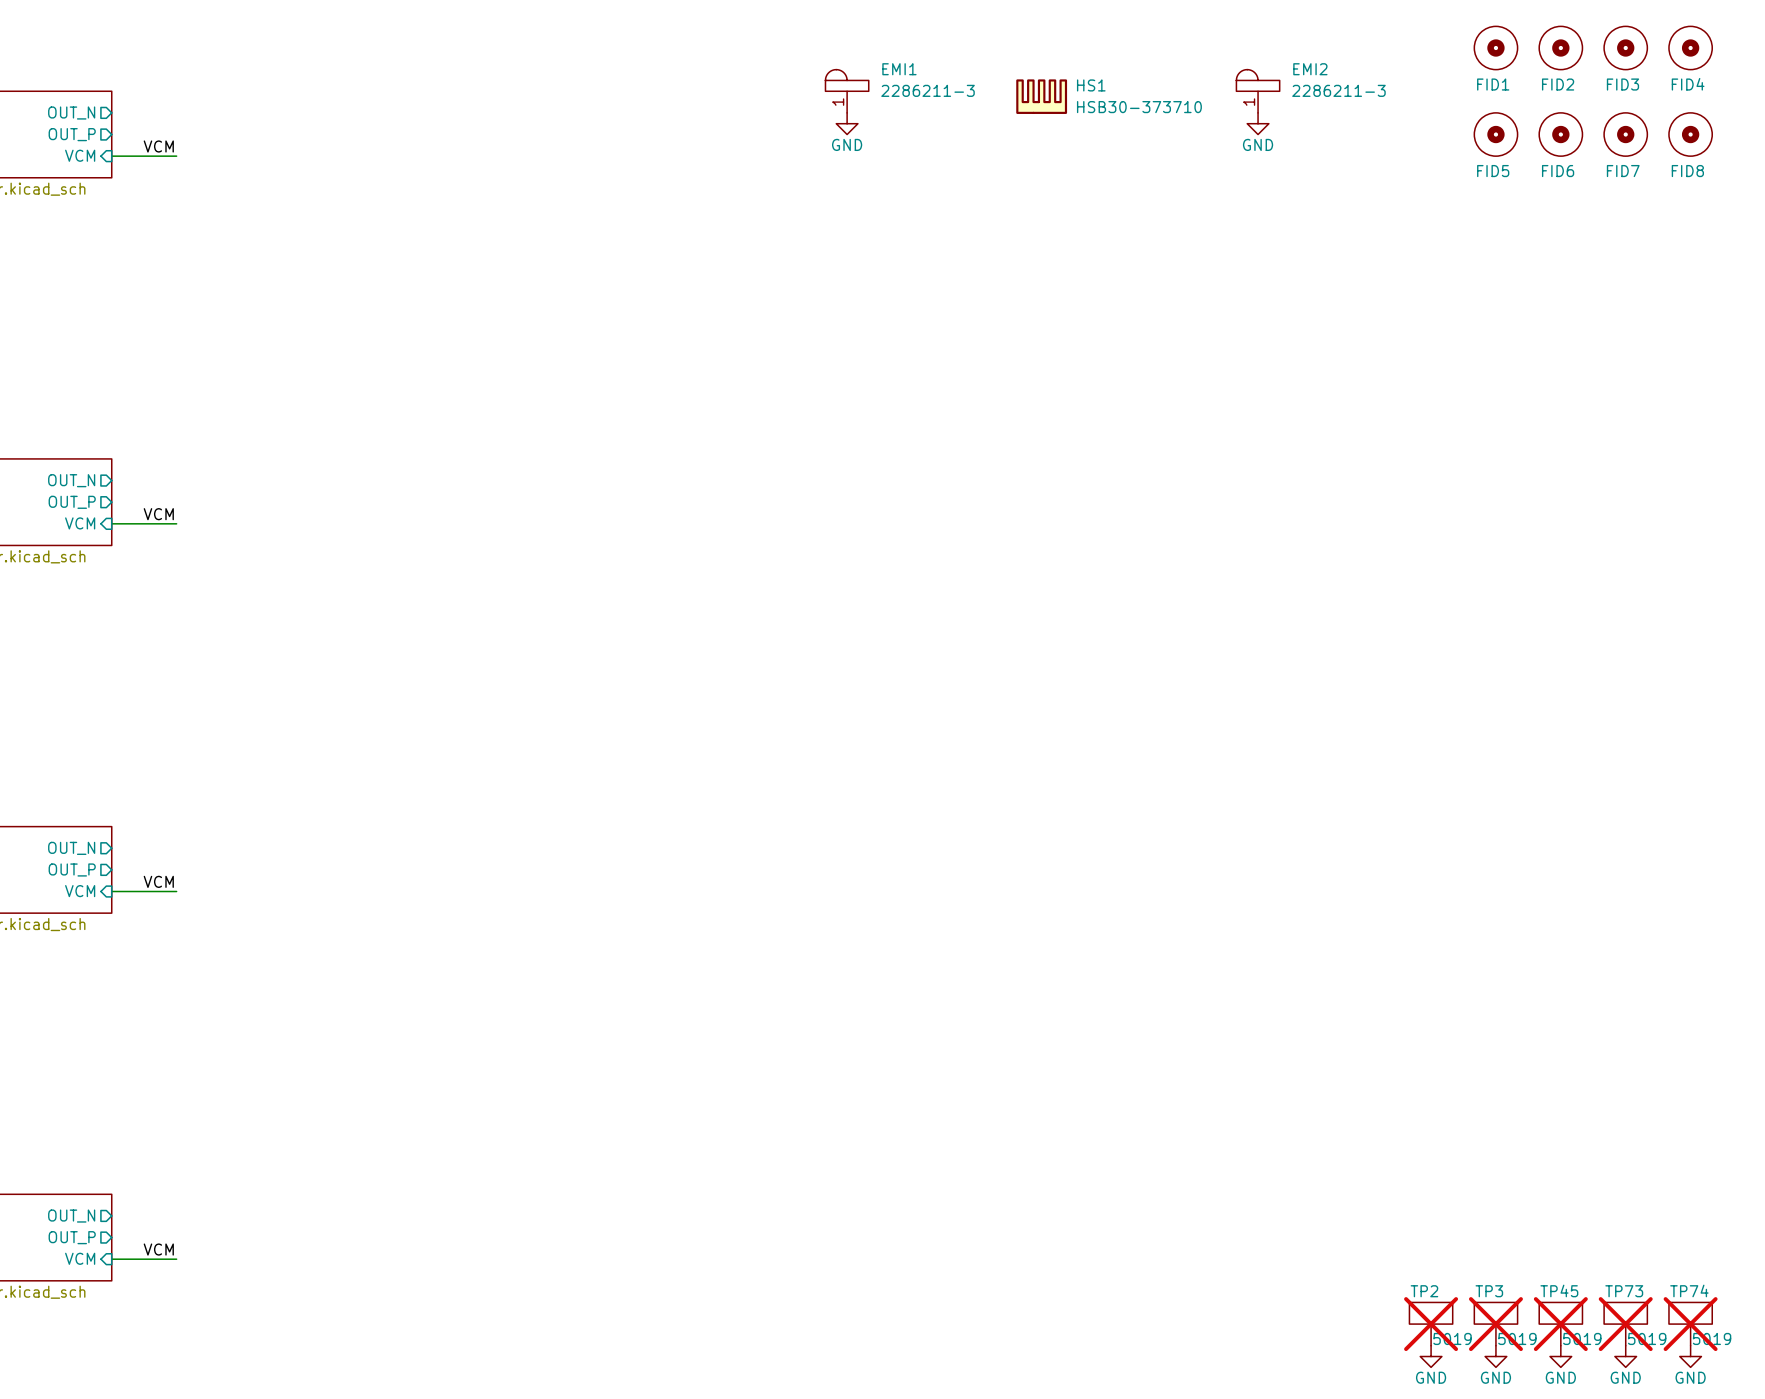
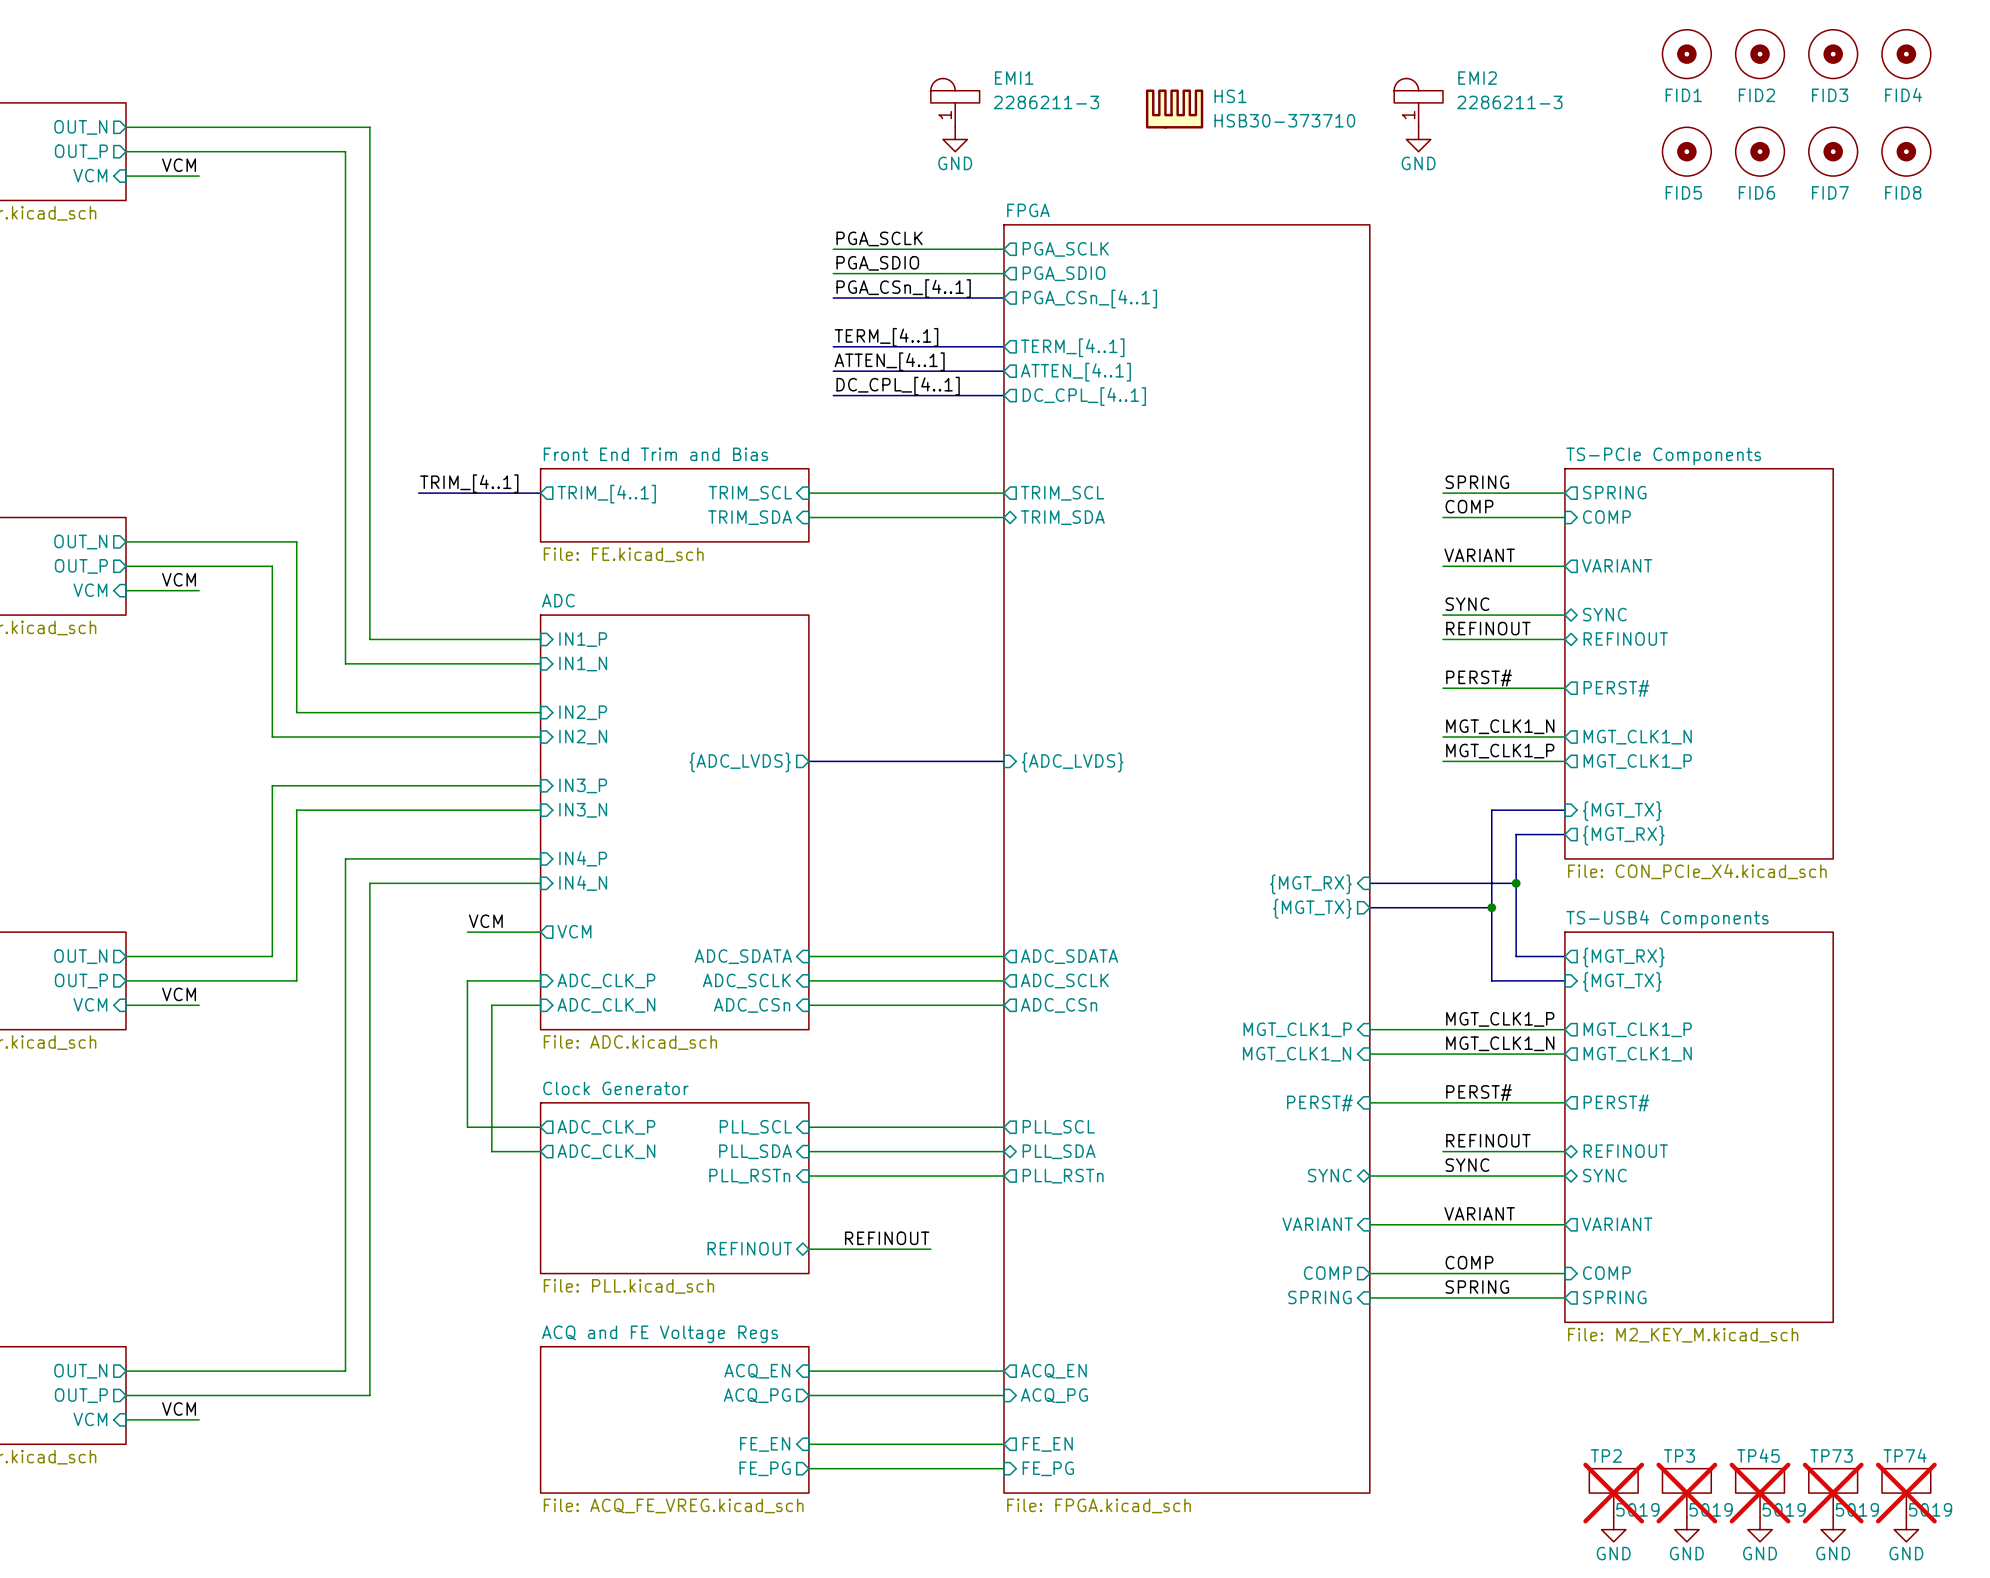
wire: none -> (126, 127) (369, 127) (369, 639) (540, 639)
wire: none -> (126, 151) (345, 151) (345, 663) (540, 663)
label: none -> PGA_SCLK (879, 238)
wire: none -> (833, 249) (1003, 249)
sheet pin: none -> PGA_SCLK (1065, 249)
label: none -> PGA_SDIO (877, 263)
wire: none -> (833, 273) (1003, 273)
sheet pin: none -> PGA_SDIO (1063, 273)
label: none -> PGA_CSn_[4..1] (903, 288)
bus: none -> (833, 298) (1003, 298)
sheet pin: none -> PGA_CSn_[4..1] (1089, 299)
label: none -> TERM_[4..1] (886, 337)
bus: none -> (833, 346) (1003, 346)
sheet pin: none -> TERM_[4..1] (1072, 347)
label: none -> ATTEN_[4..1] (889, 361)
bus: none -> (833, 371) (1003, 371)
sheet pin: none -> ATTEN_[4..1] (1075, 372)
label: none -> DC_CPL_[4..1] (898, 386)
bus: none -> (833, 395) (1003, 395)
sheet pin: none -> DC_CPL_[4..1] (1084, 396)
label: none -> SPRING (1477, 482)
label: none -> TRIM_[4..1] (469, 483)
sheet pin: none -> SPRING (1614, 492)
bus: none -> (418, 493) (540, 493)
sheet pin: none -> TRIM_SCL (750, 493)
wire: none -> (808, 493) (1003, 493)
sheet pin: none -> TRIM_SCL (1062, 493)
wire: none -> (1442, 493) (1564, 493)
sheet pin: none -> TRIM_[4..1] (606, 494)
sheet Front End Trim and Bias: none -> File: FE.kicad_sch (674, 505)
label: none -> COMP (1469, 506)
wire: none -> (808, 517) (1003, 517)
wire: none -> (1442, 517) (1564, 517)
sheet pin: none -> COMP (1606, 517)
sheet pin: none -> TRIM_SDA (750, 517)
sheet pin: none -> TRIM_SDA (1062, 517)
wire: none -> (126, 541) (296, 541) (296, 712) (540, 712)
label: none -> VARIANT (1479, 555)
sheet pin: none -> VARIANT (1617, 565)
wire: none -> (126, 566) (272, 566) (272, 737) (540, 737)
wire: none -> (1442, 566) (1564, 566)
label: none -> SYNC (1467, 604)
wire: none -> (1442, 615) (1564, 615)
sheet pin: none -> SYNC (1604, 614)
label: none -> REFINOUT (1488, 628)
sheet pin: none -> REFINOUT (1625, 639)
sheet pin: none -> IN1_P (583, 639)
wire: none -> (1442, 639) (1564, 639)
sheet pin: none -> IN1_N (583, 663)
sheet TS-PCIe Components: none -> File: CON_PCIe_X4.kicad_sch (1699, 663)
label: none -> PERST# (1479, 677)
wire: none -> (1442, 688) (1564, 688)
sheet pin: none -> PERST# (1616, 688)
sheet pin: none -> IN2_P (583, 712)
label: none -> MGT_CLK1_N (1500, 726)
sheet pin: none -> IN2_N (583, 737)
wire: none -> (1442, 737) (1564, 737)
sheet pin: none -> MGT_CLK1_N (1637, 737)
label: none -> MGT_CLK1_P (1500, 751)
bus: none -> (808, 761) (1003, 761)
wire: none -> (1442, 761) (1564, 761)
sheet pin: none -> MGT_CLK1_P (1637, 761)
sheet pin: none -> {ADC_LVDS} (740, 762)
sheet pin: none -> {ADC_LVDS} (1072, 762)
wire: none -> (540, 785) (272, 785) (272, 956) (126, 956)
sheet pin: none -> IN3_P (583, 785)
wire: none -> (540, 810) (296, 810) (296, 980) (126, 980)
sheet pin: none -> IN3_N (583, 810)
bus: none -> (1564, 810) (1491, 810) (1491, 980) (1564, 980)
sheet pin: none -> {MGT_TX} (1622, 811)
sheet ADC: none -> File: ADC.kicad_sch (674, 822)
bus: none -> (1564, 834) (1516, 834) (1516, 956) (1564, 956)
sheet pin: none -> {MGT_RX} (1623, 835)
wire: none -> (540, 858) (345, 858) (345, 1371) (126, 1371)
sheet pin: none -> IN4_P (583, 858)
sheet FPGA: none -> File: FPGA.kicad_sch (1186, 858)
wire: none -> (540, 883) (369, 883) (369, 1395) (126, 1395)
sheet pin: none -> IN4_N (583, 883)
bus: none -> (1369, 883) (1516, 883)
junction: none -> (1516, 883)
sheet pin: none -> {MGT_RX} (1310, 884)
bus: none -> (1369, 907) (1491, 907)
junction: none -> (1491, 907)
sheet pin: none -> {MGT_TX} (1312, 908)
label: none -> VCM (485, 921)
wire: none -> (467, 932) (540, 932)
sheet pin: none -> VCM (574, 931)
sheet pin: none -> ADC_SDATA (743, 956)
wire: none -> (808, 956) (1003, 956)
sheet pin: none -> ADC_SDATA (1069, 956)
sheet pin: none -> {MGT_RX} (1623, 957)
wire: none -> (540, 980) (467, 980) (467, 1127) (540, 1127)
sheet pin: none -> ADC_CLK_P (606, 981)
sheet pin: none -> ADC_SCLK (746, 981)
wire: none -> (808, 980) (1003, 980)
sheet pin: none -> ADC_SCLK (1064, 981)
sheet pin: none -> {MGT_TX} (1622, 981)
wire: none -> (540, 1005) (491, 1005) (491, 1151) (540, 1151)
sheet pin: none -> ADC_CLK_N (606, 1005)
sheet pin: none -> ADC_CSn (752, 1005)
wire: none -> (808, 1005) (1003, 1005)
sheet pin: none -> ADC_CSn (1059, 1005)
label: none -> MGT_CLK1_P (1500, 1019)
sheet pin: none -> MGT_CLK1_P (1297, 1029)
wire: none -> (1369, 1029) (1564, 1029)
sheet pin: none -> MGT_CLK1_P (1637, 1029)
label: none -> MGT_CLK1_N (1500, 1043)
sheet pin: none -> MGT_CLK1_N (1297, 1054)
wire: none -> (1369, 1054) (1564, 1054)
sheet pin: none -> MGT_CLK1_N (1637, 1054)
label: none -> PERST# (1479, 1092)
sheet pin: none -> PERST# (1319, 1102)
wire: none -> (1369, 1102) (1564, 1102)
sheet pin: none -> PERST# (1616, 1102)
sheet pin: none -> ADC_CLK_P (606, 1127)
sheet pin: none -> PLL_SCL (755, 1127)
wire: none -> (808, 1127) (1003, 1127)
sheet pin: none -> PLL_SCL (1058, 1127)
sheet TS-USB4 Components: none -> File: M2_KEY_M.kicad_sch (1699, 1127)
label: none -> REFINOUT (1488, 1140)
sheet pin: none -> REFINOUT (1625, 1151)
sheet pin: none -> ADC_CLK_N (606, 1151)
sheet pin: none -> PLL_SDA (755, 1151)
wire: none -> (808, 1151) (1003, 1151)
sheet pin: none -> PLL_SDA (1059, 1151)
wire: none -> (1442, 1151) (1564, 1151)
label: none -> SYNC (1467, 1165)
wire: none -> (808, 1176) (1003, 1176)
sheet pin: none -> SYNC (1329, 1175)
wire: none -> (1369, 1176) (1564, 1176)
sheet pin: none -> SYNC (1604, 1175)
sheet pin: none -> PLL_RSTn (749, 1176)
sheet pin: none -> PLL_RSTn (1063, 1176)
sheet Clock Generator: none -> File: PLL.kicad_sch (674, 1188)
label: none -> VARIANT (1479, 1213)
sheet pin: none -> VARIANT (1317, 1224)
sheet pin: none -> VARIANT (1617, 1224)
wire: none -> (1369, 1224) (1564, 1224)
label: none -> REFINOUT (887, 1238)
sheet pin: none -> REFINOUT (749, 1248)
wire: none -> (808, 1249) (930, 1249)
label: none -> COMP (1469, 1262)
sheet pin: none -> COMP (1327, 1273)
wire: none -> (1369, 1273) (1564, 1273)
sheet pin: none -> COMP (1606, 1273)
label: none -> SPRING (1477, 1287)
sheet pin: none -> SPRING (1319, 1297)
sheet pin: none -> SPRING (1614, 1297)
wire: none -> (1369, 1297) (1564, 1297)
wire: none -> (808, 1371) (1003, 1371)
sheet pin: none -> ACQ_EN (757, 1371)
sheet pin: none -> ACQ_EN (1053, 1371)
sheet pin: none -> ACQ_PG (757, 1395)
wire: none -> (808, 1395) (1003, 1395)
sheet pin: none -> ACQ_PG (1054, 1395)
sheet ACQ and FE Voltage Regs: none -> File: ACQ_FE_VREG.kicad_sch (674, 1419)
sheet pin: none -> FE_EN (765, 1444)
wire: none -> (808, 1444) (1003, 1444)
sheet pin: none -> FE_EN (1047, 1444)
sheet pin: none -> FE_PG (765, 1468)
wire: none -> (808, 1468) (1003, 1468)
sheet pin: none -> FE_PG (1048, 1468)

